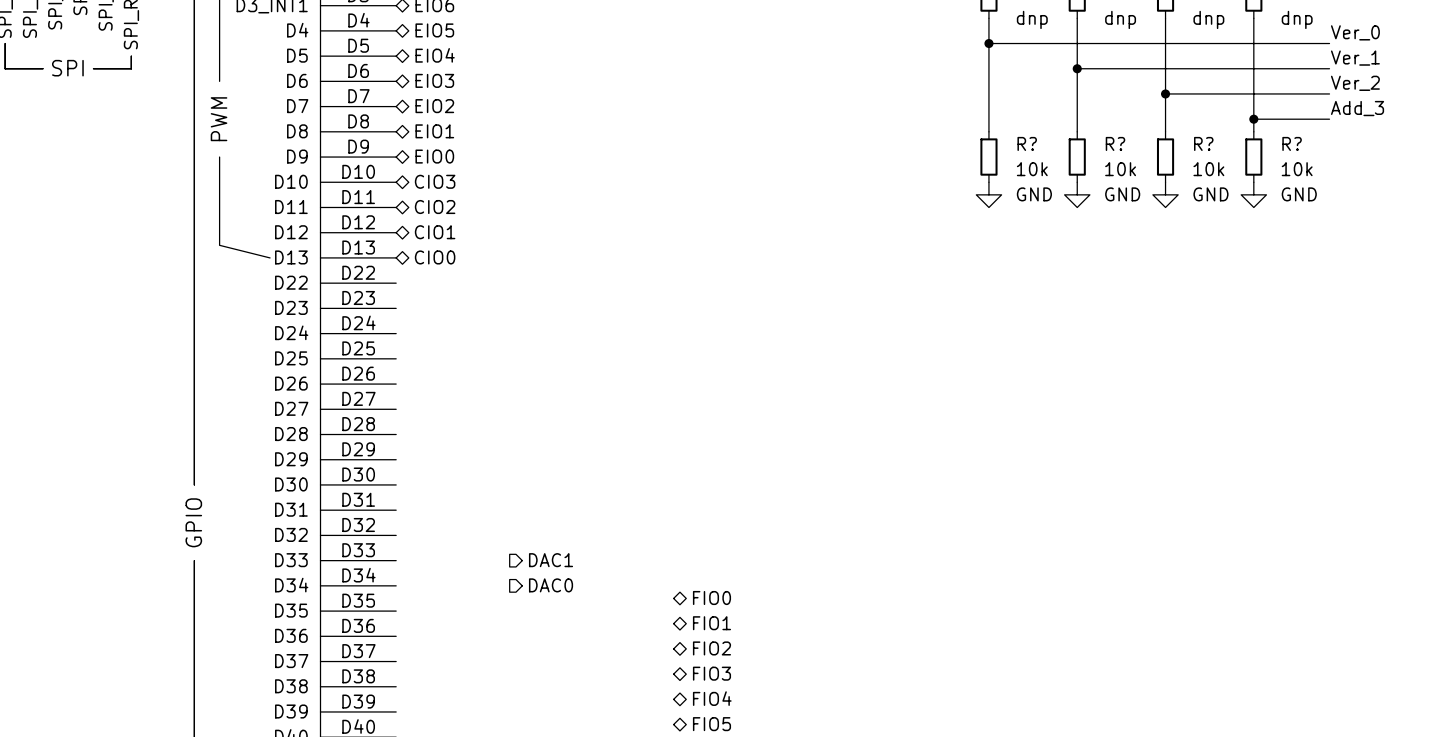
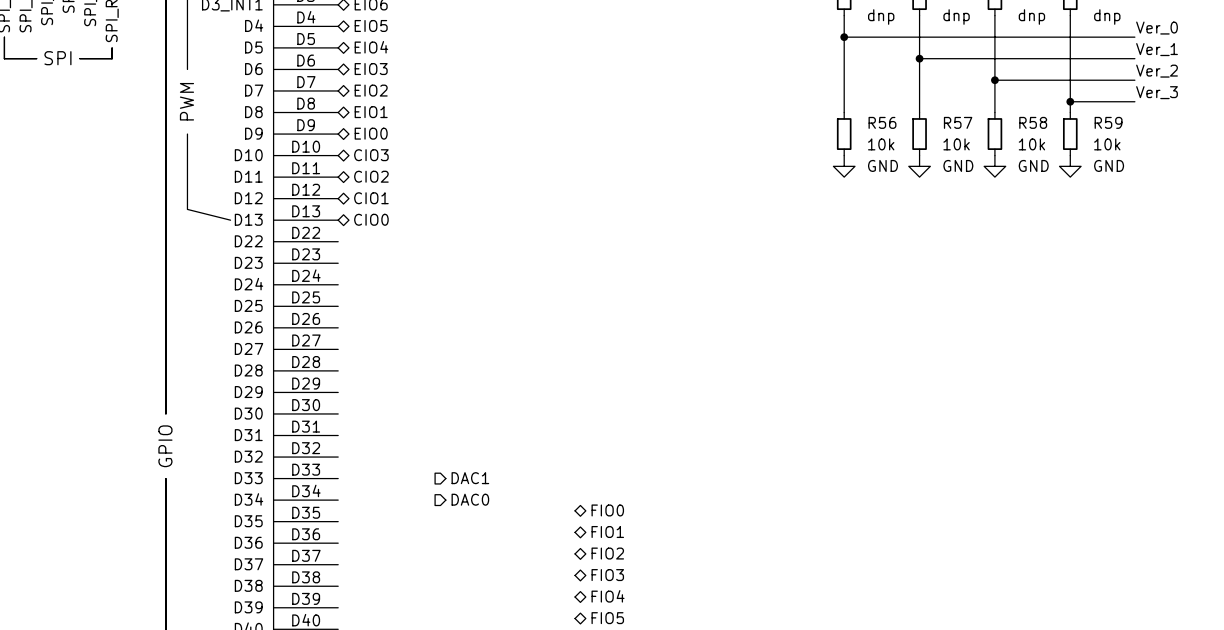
label: Add_3 (1357, 108) -> Ver_3 (1157, 92)
R? name: R? (1027, 143) -> R56 (882, 122)
R? name: R? (1115, 143) -> R57 (958, 122)
R? name: R? (1203, 143) -> R58 (1033, 122)
R? name: R? (1292, 143) -> R59 (1108, 122)

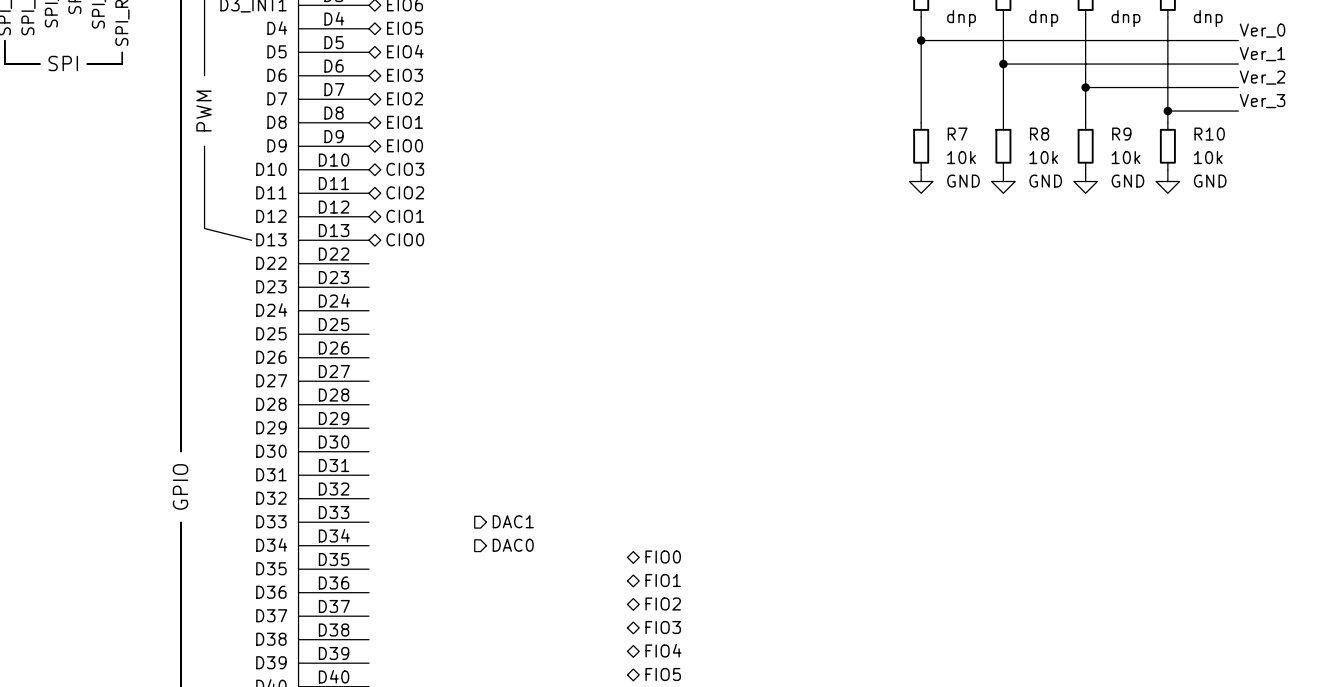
R56 name: R56 (882, 122) -> R7 (957, 134)
R57 name: R57 (958, 122) -> R8 (1039, 134)
R58 name: R58 (1033, 122) -> R9 (1121, 134)
R59 name: R59 (1108, 122) -> R10 (1209, 134)

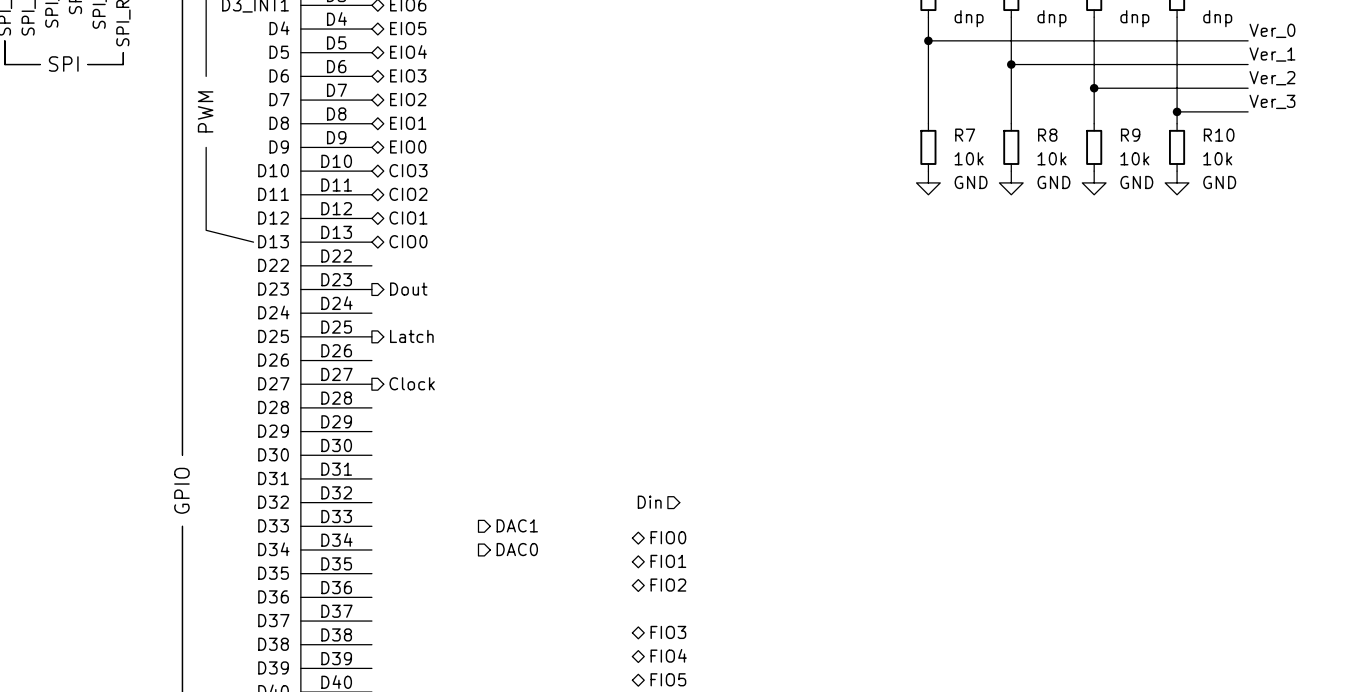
hierarchical label: none -> Dout (408, 289)
hierarchical label: none -> Latch (411, 336)
hierarchical label: none -> Clock (412, 383)
hierarchical label: none -> Din (649, 502)
hierarchical label: none -> FIO0 (668, 537)
hierarchical label: FIO0 (663, 557) -> FIO1 (668, 561)
hierarchical label: FIO1 (663, 580) -> FIO2 (668, 585)
hierarchical label: FIO2 (663, 604) -> none

